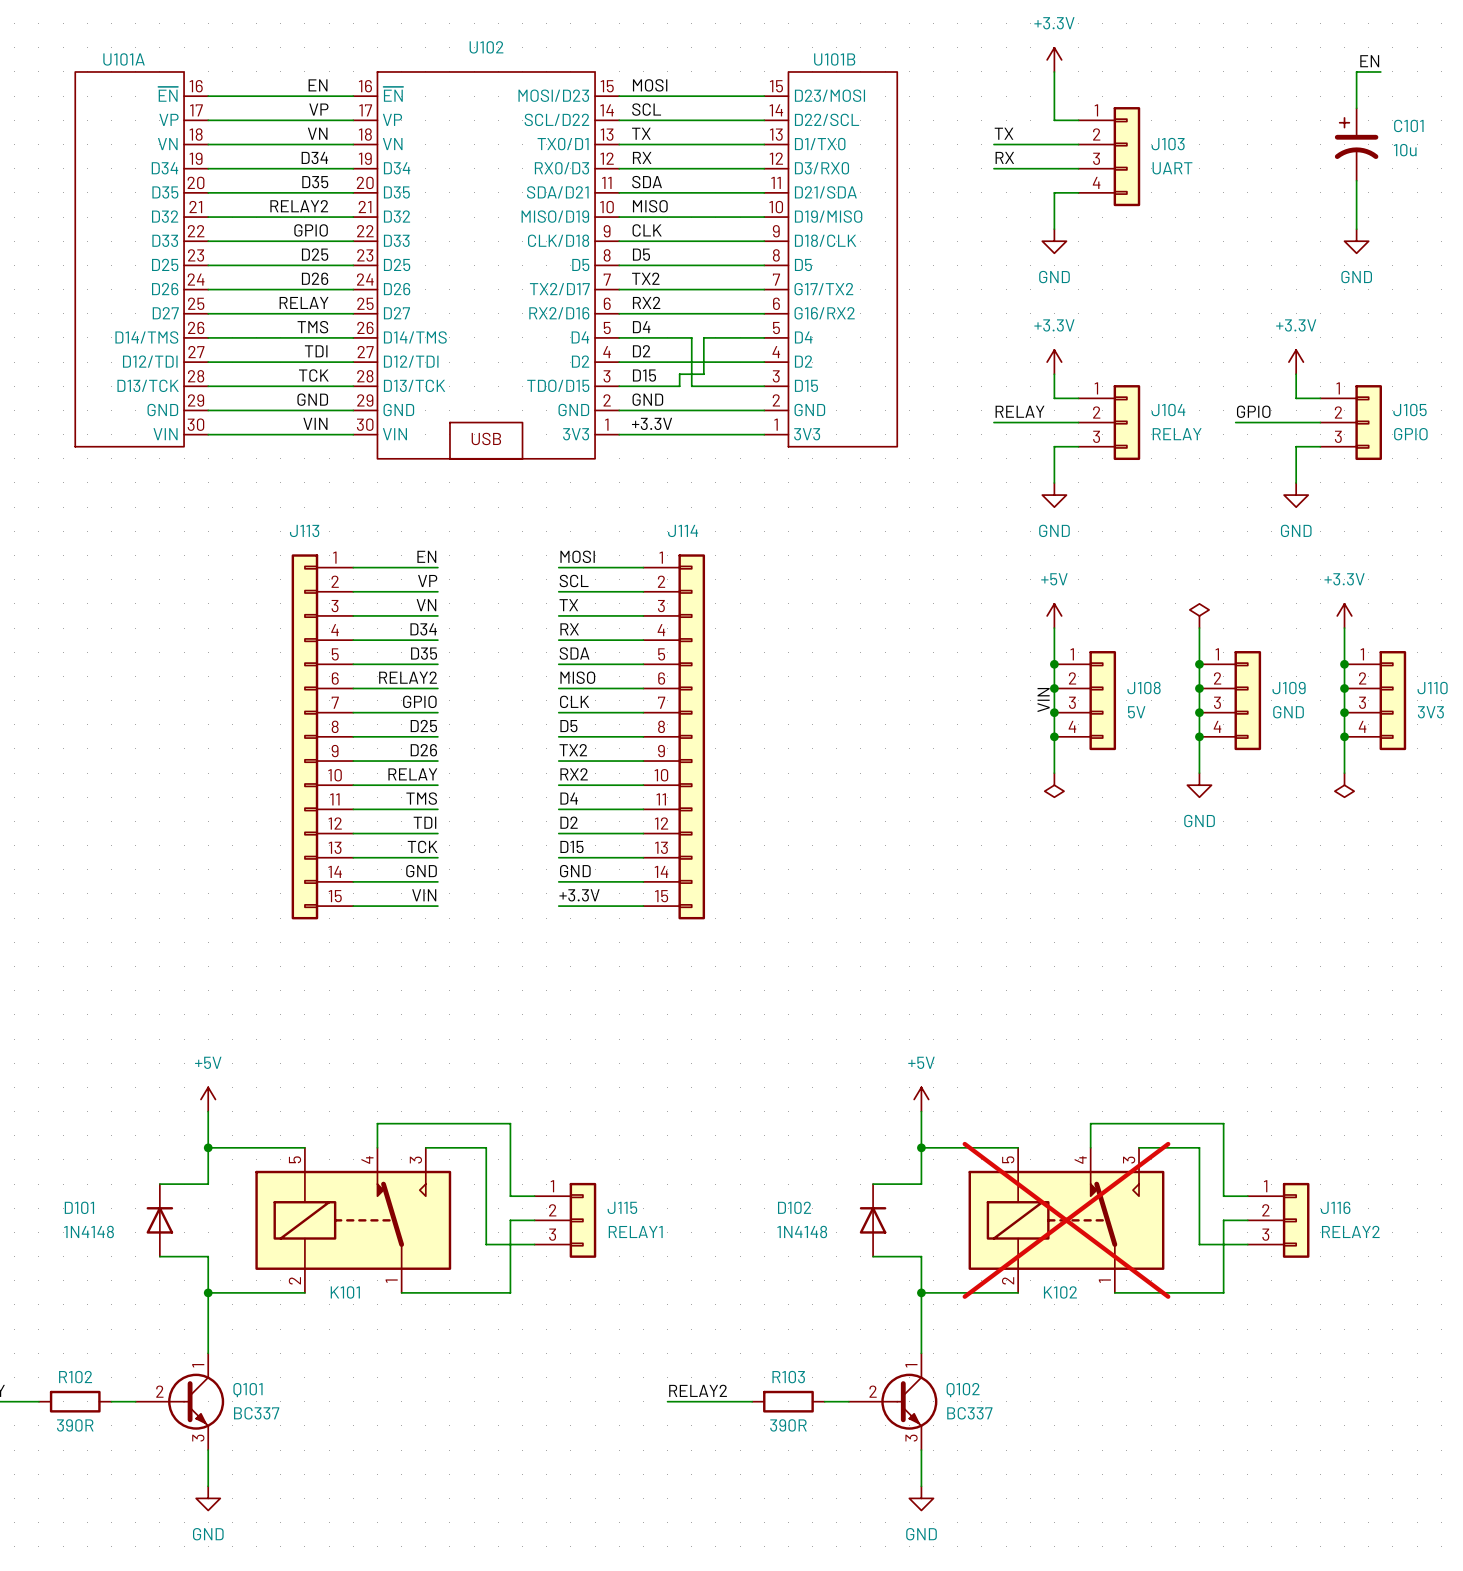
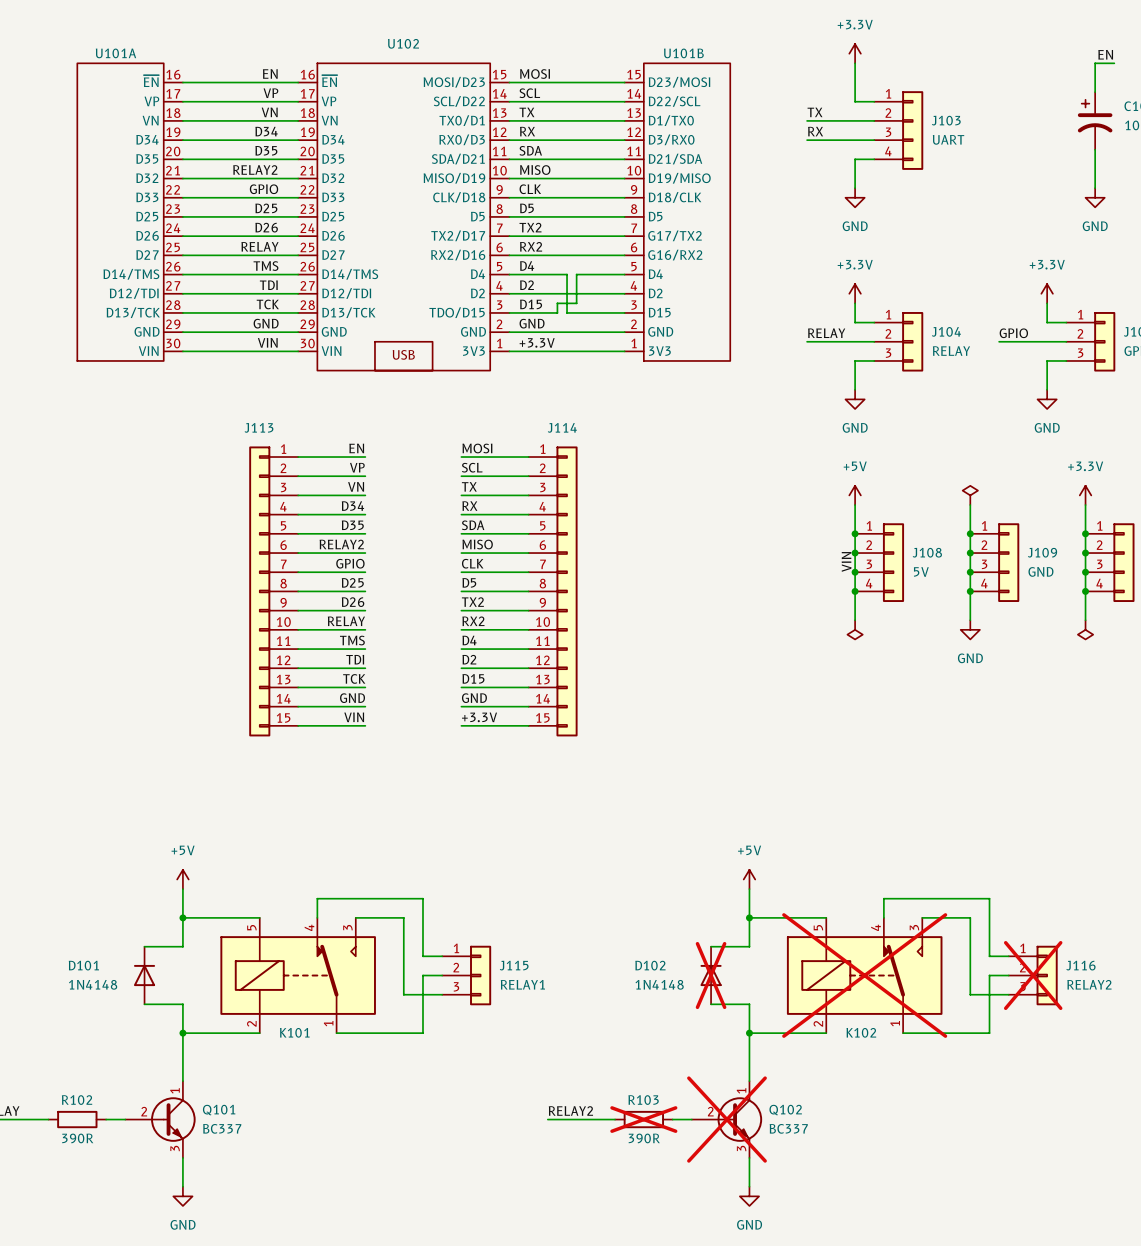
D102 do-not-place cross: none -> (711, 975)
J116 do-not-place cross: none -> (1033, 975)
R103 do-not-place cross: none -> (643, 1119)
Q102 do-not-place cross: none -> (726, 1119)

